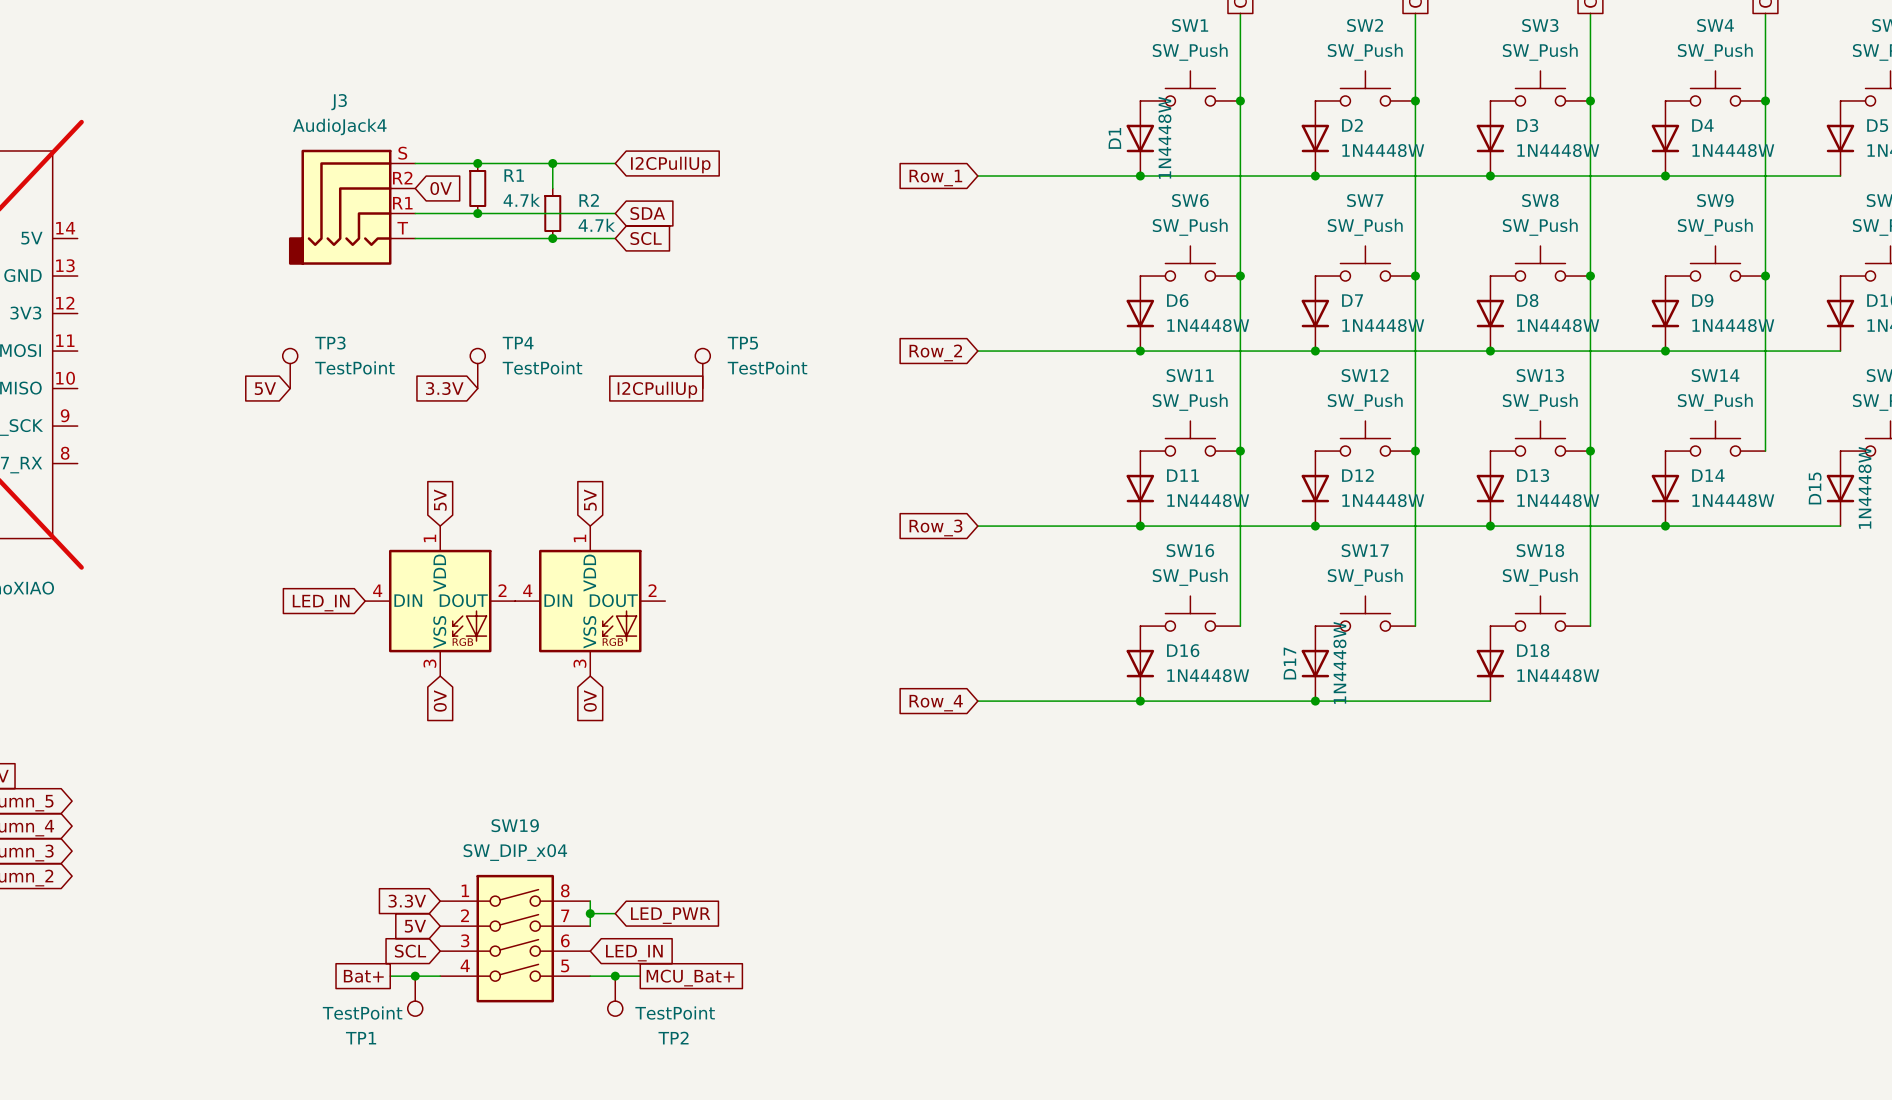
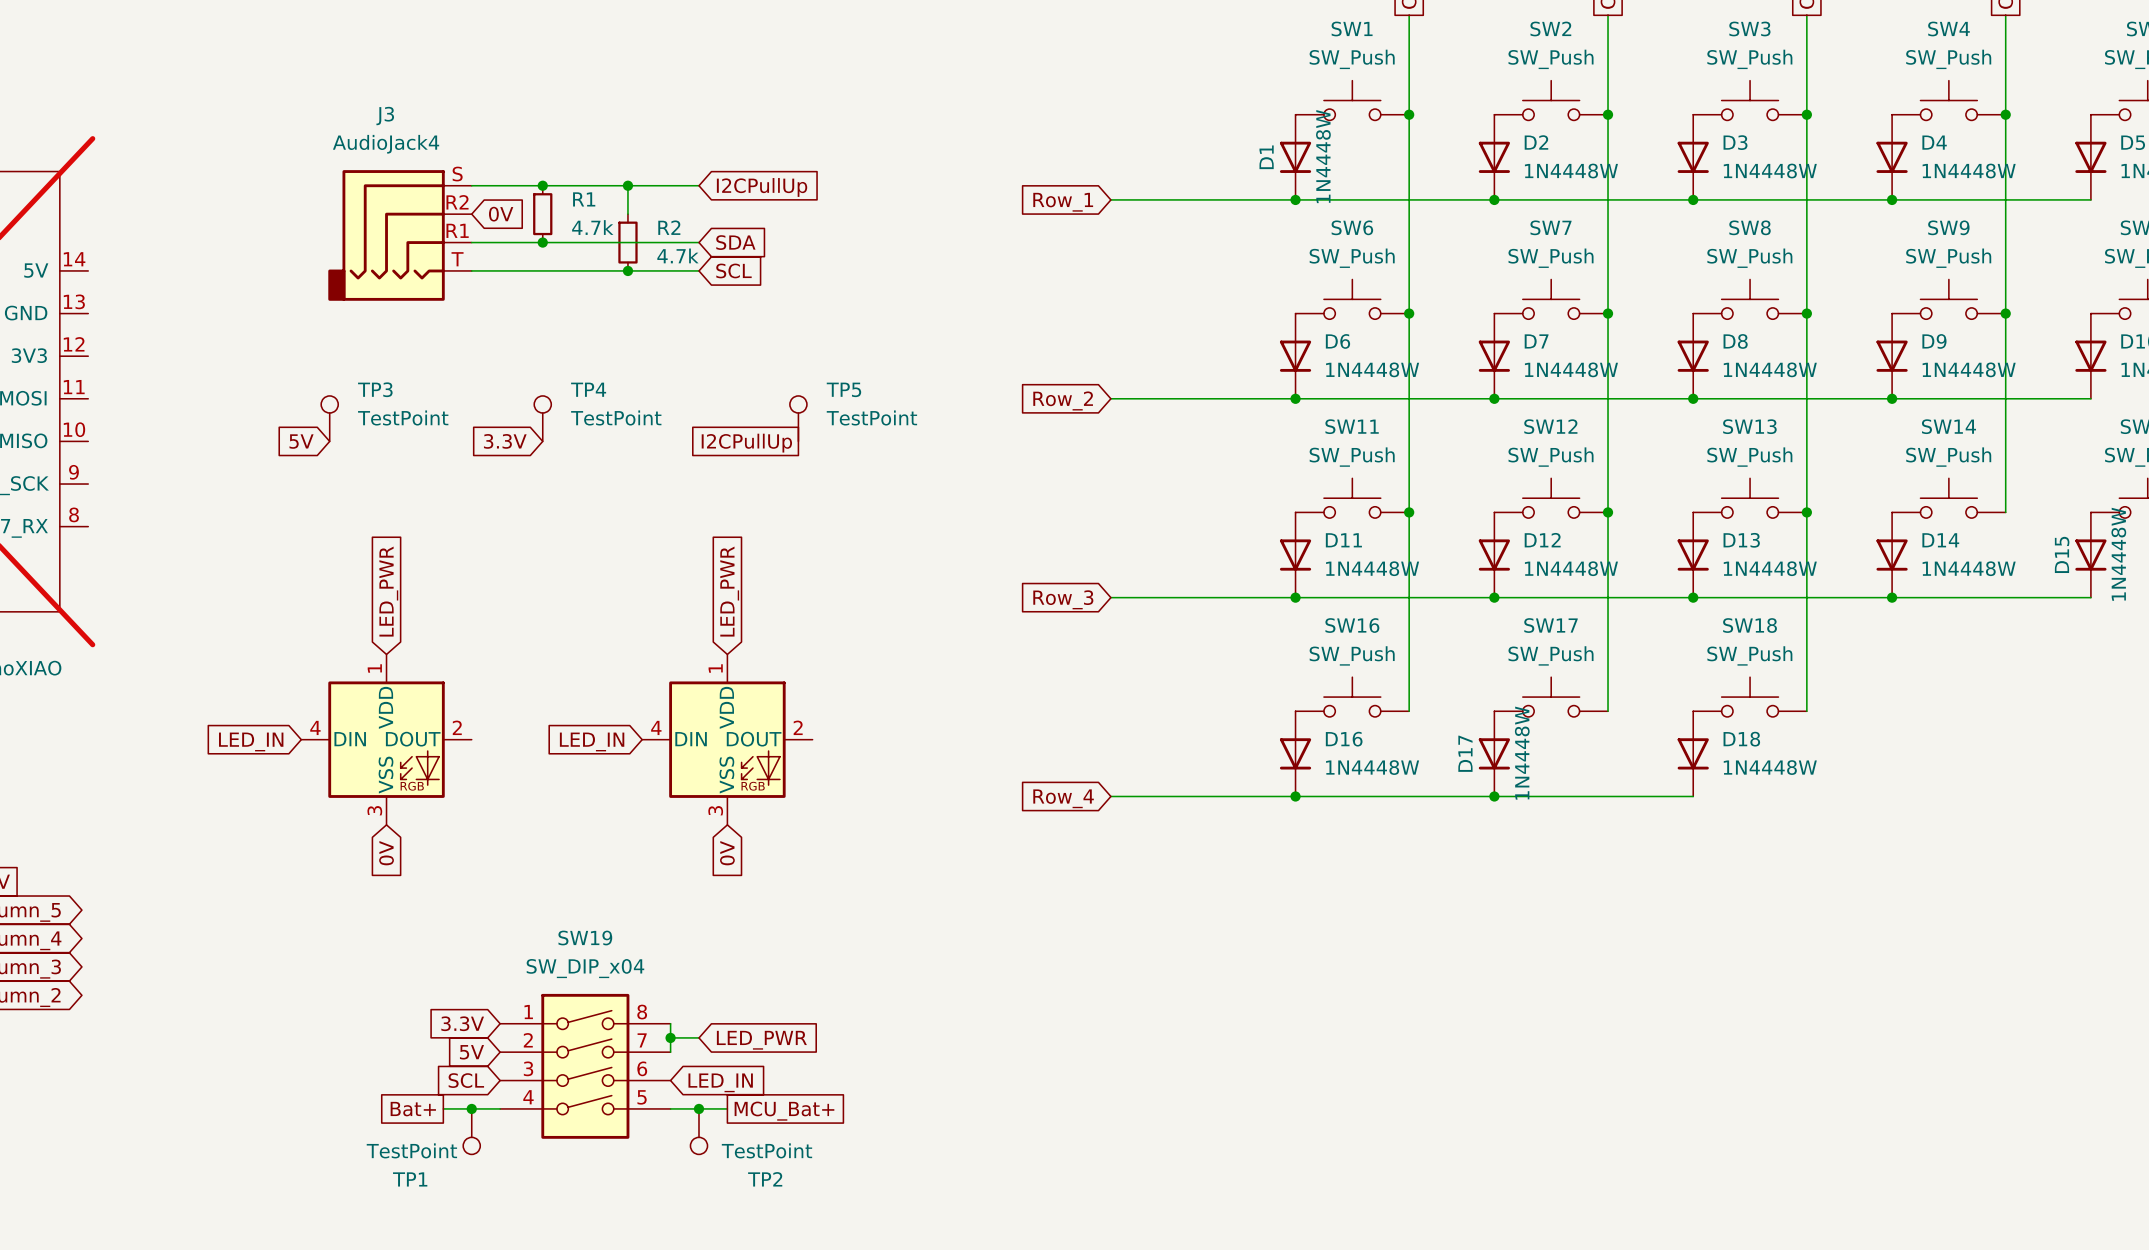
global label: 5V (440, 500) -> none
global label: 5V (590, 500) -> none
global label: none -> LED_PWR (388, 591)
global label: none -> LED_PWR (729, 591)
part: (440, 601) -> none
part position: (590, 601) -> (727, 739)
global label: LED_IN (321, 603) -> none
part: none -> (386, 739)
global label: none -> LED_IN (251, 741)
global label: none -> LED_IN (592, 741)
global label: 0V (440, 700) -> none
global label position: 0V (590, 700) -> 0V (727, 853)
global label: none -> 0V (386, 853)

